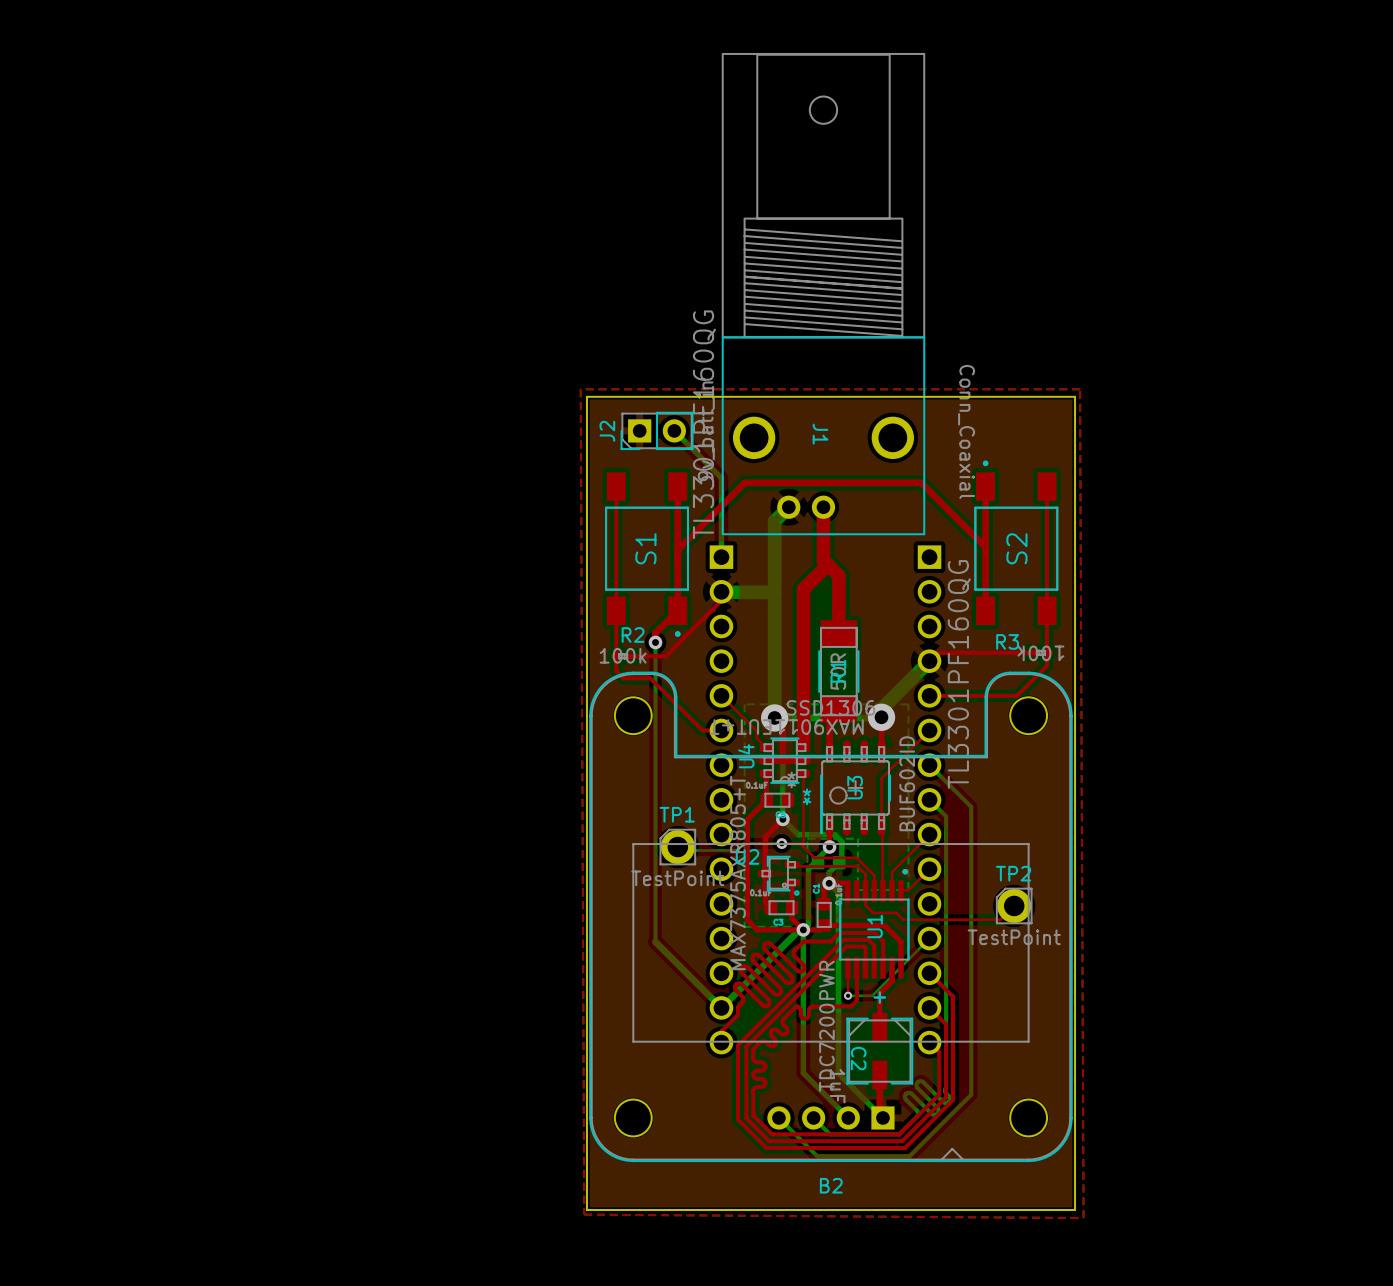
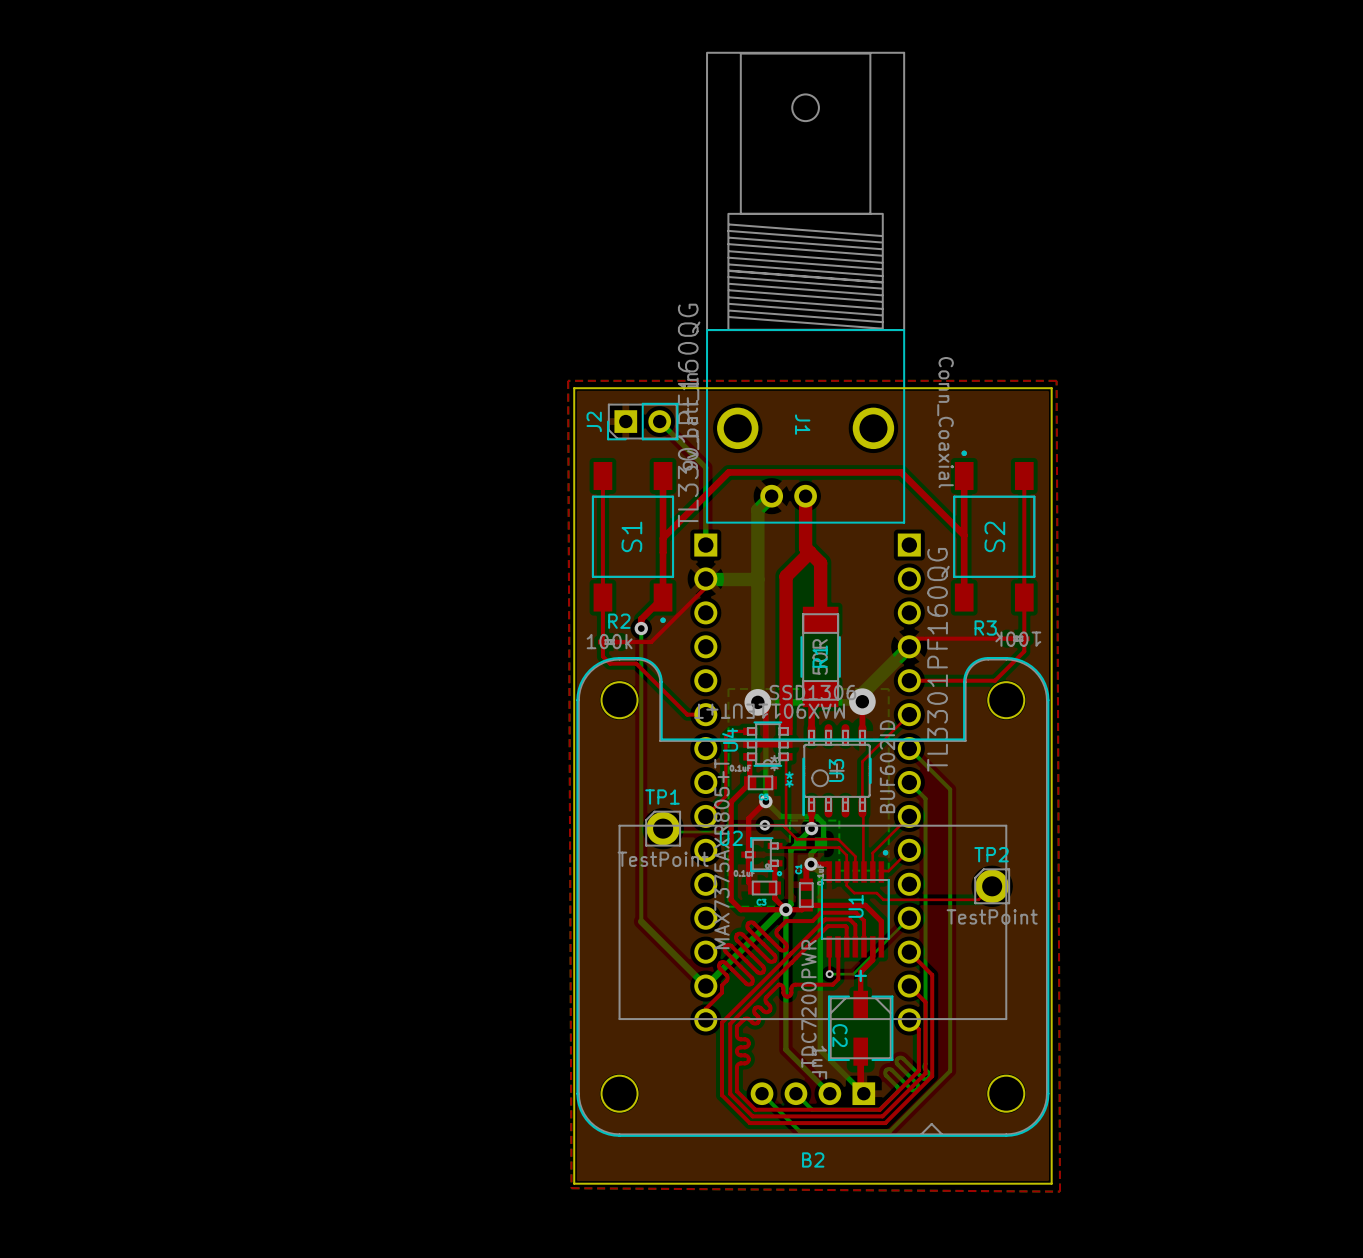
top track: (721, 695) (756, 731) (756, 738) (766, 747) -> (705, 816) (725, 796) (725, 737) (731, 731) (749, 731)

